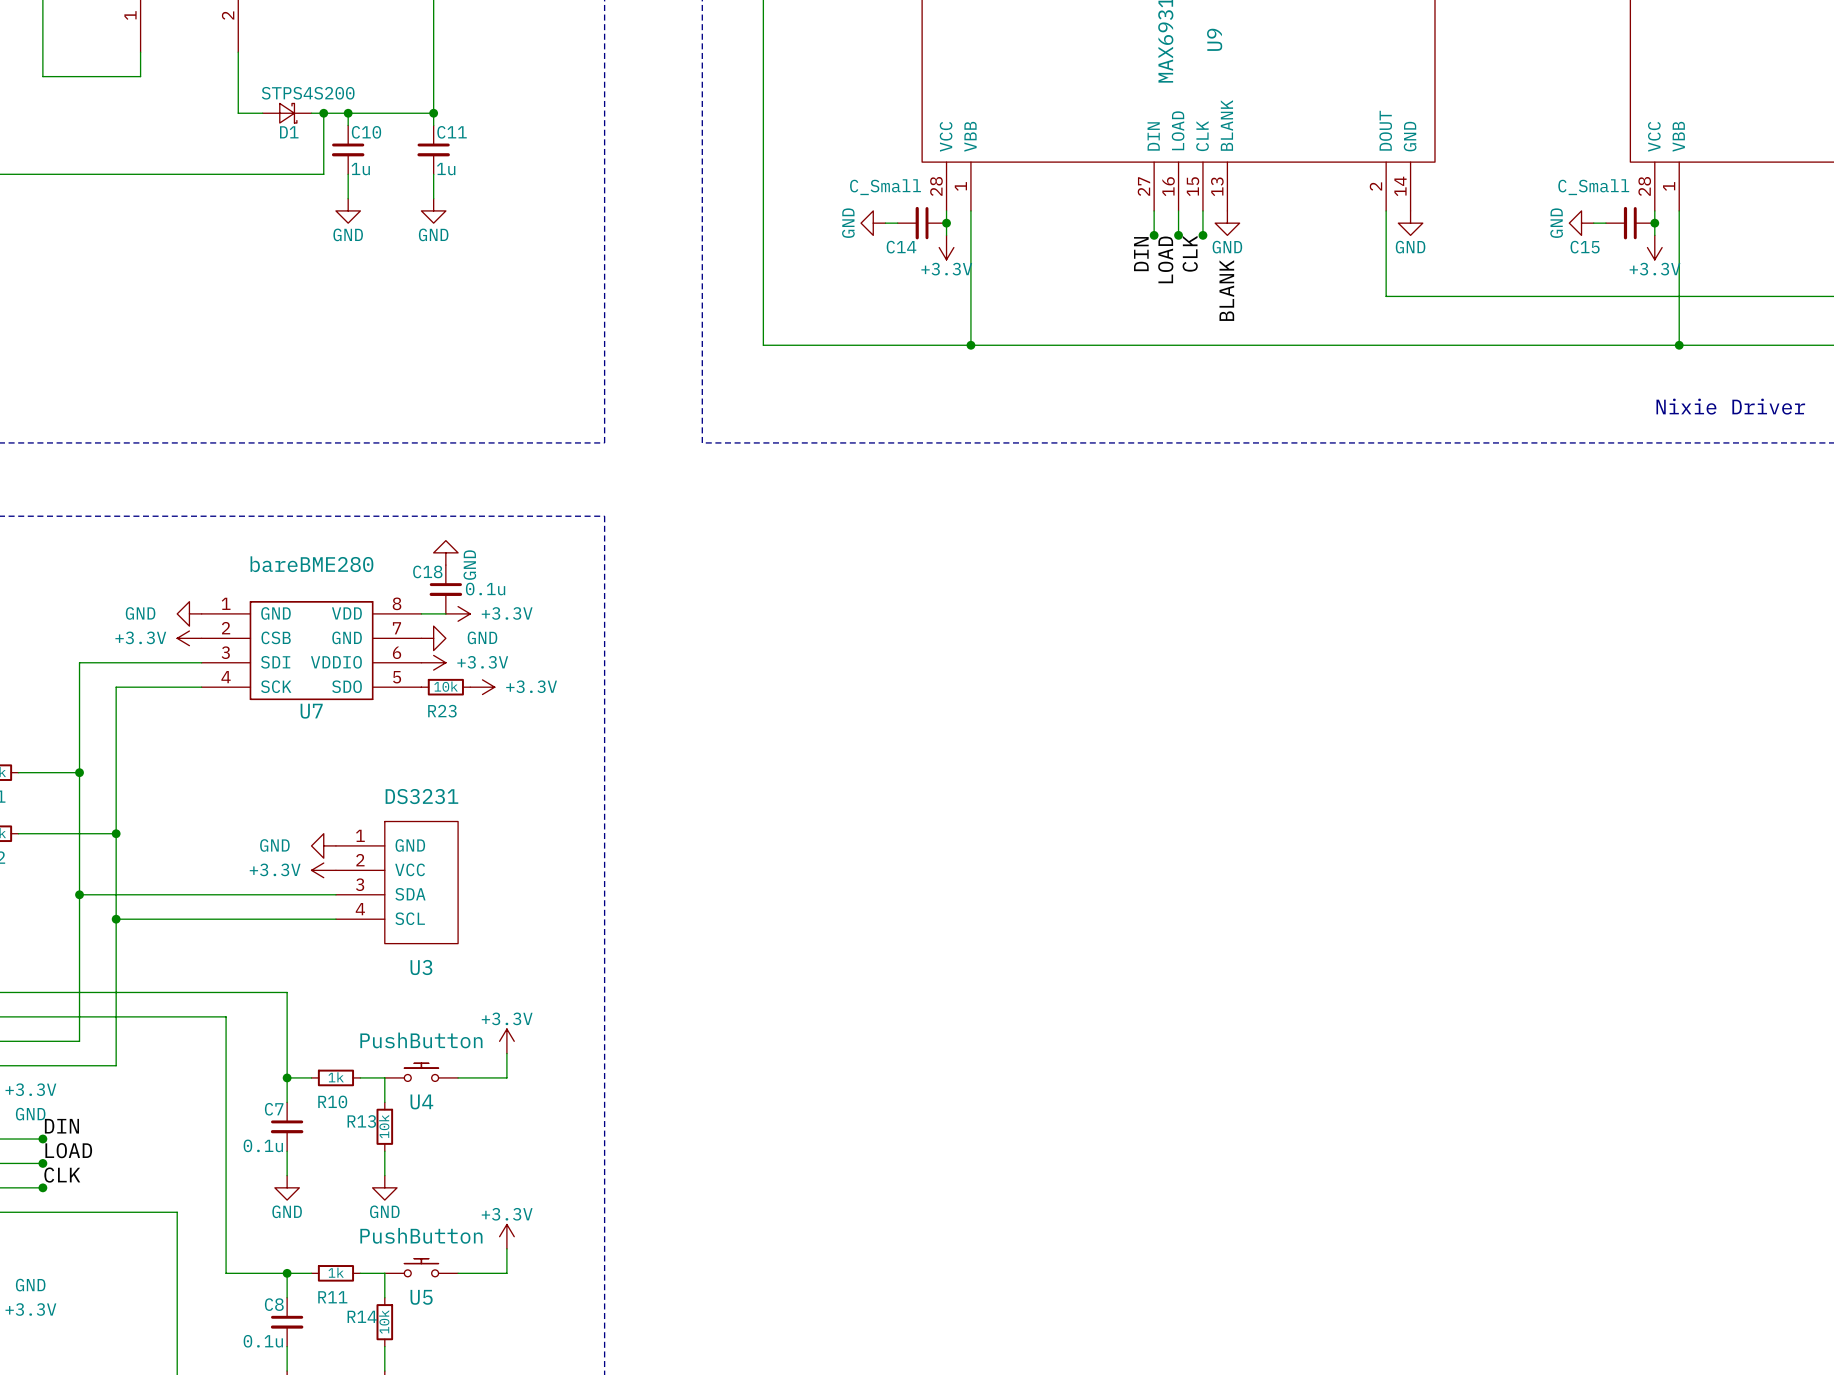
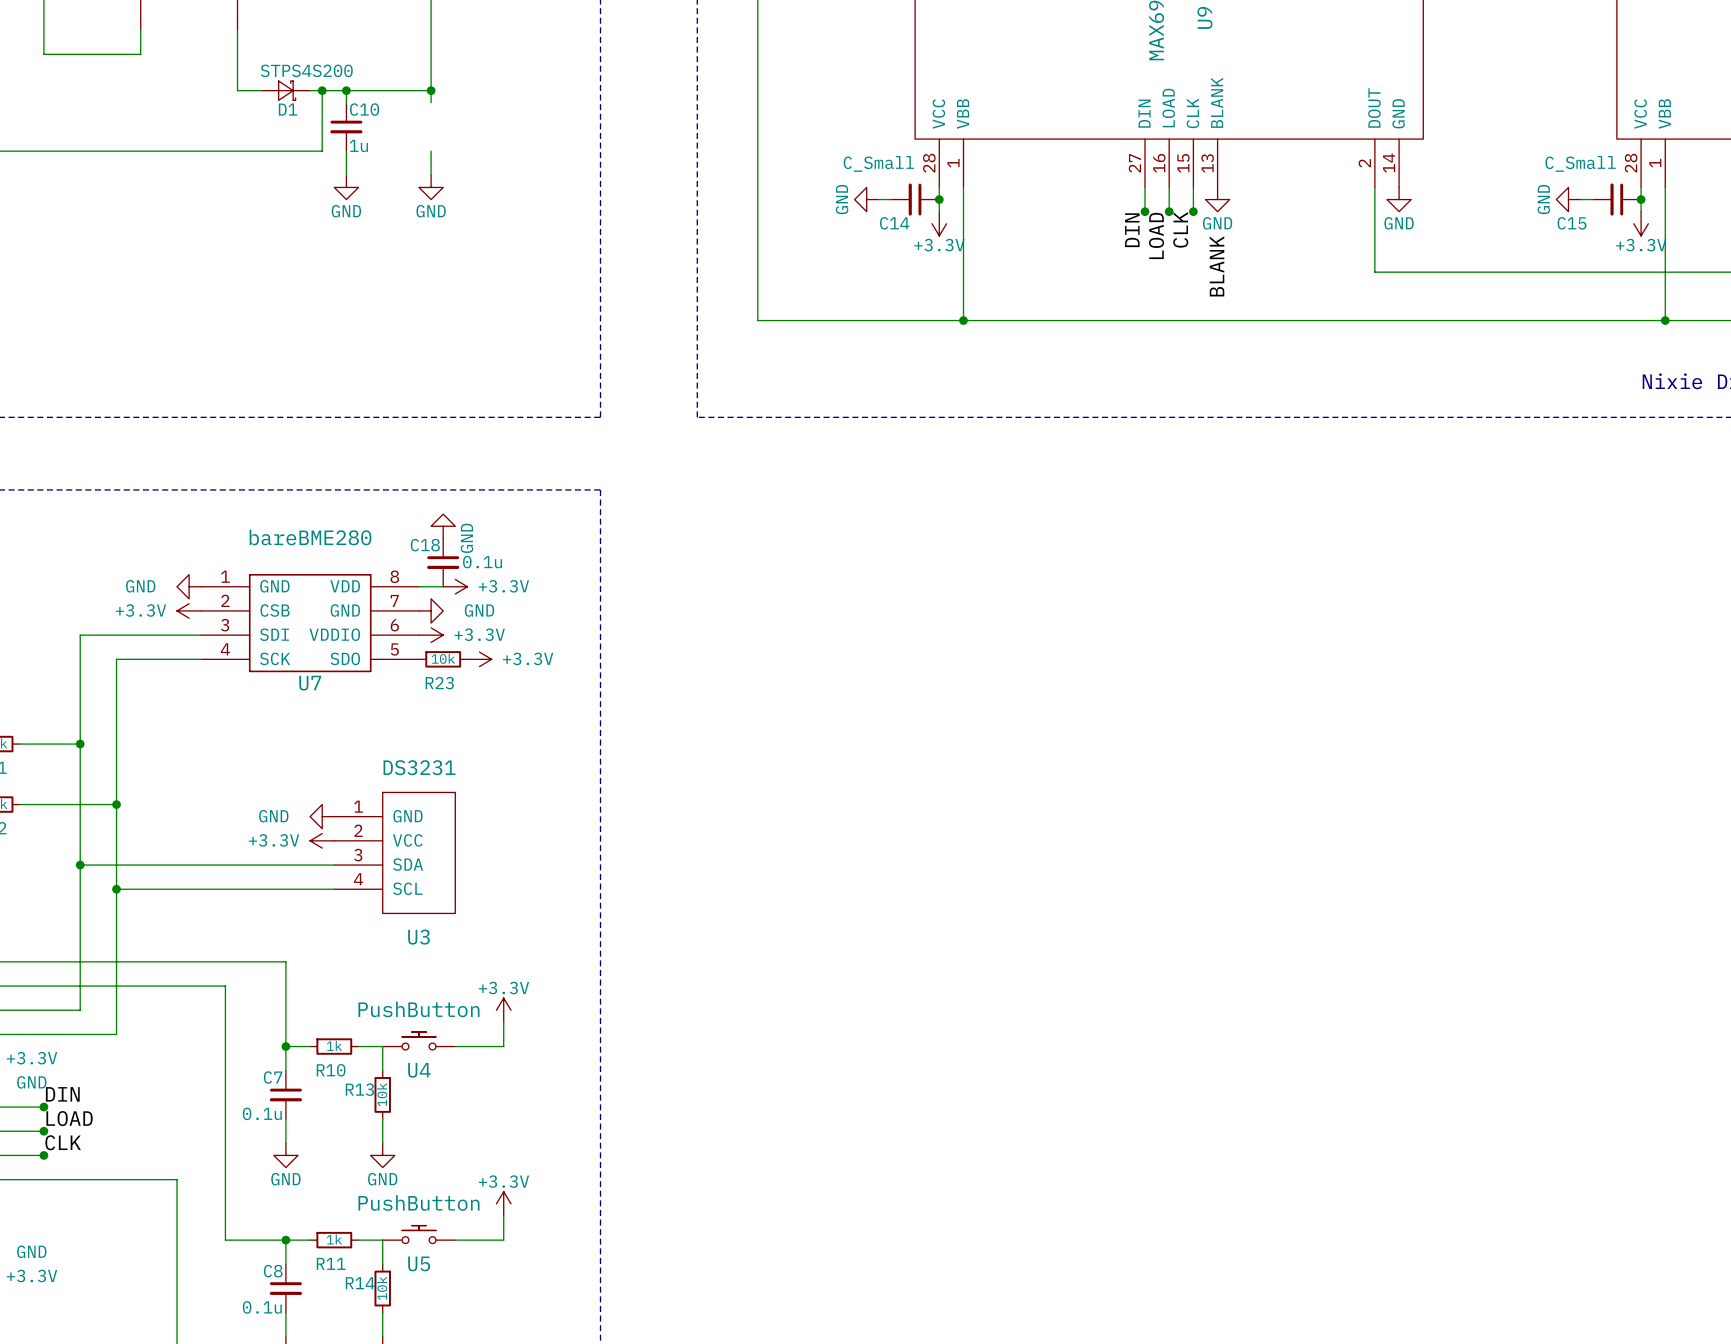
C11: 1u (433, 149) -> none

